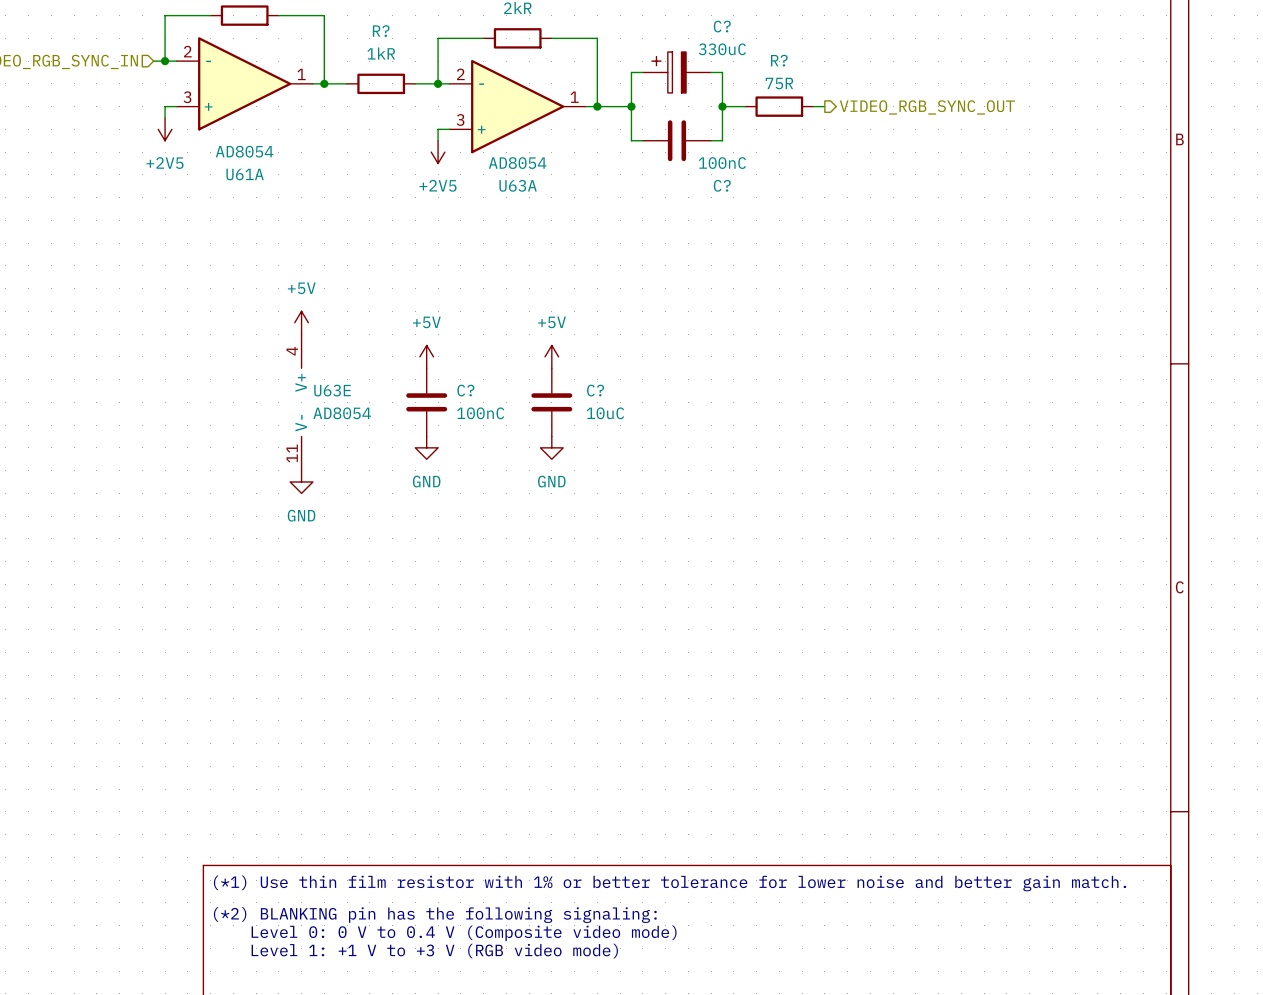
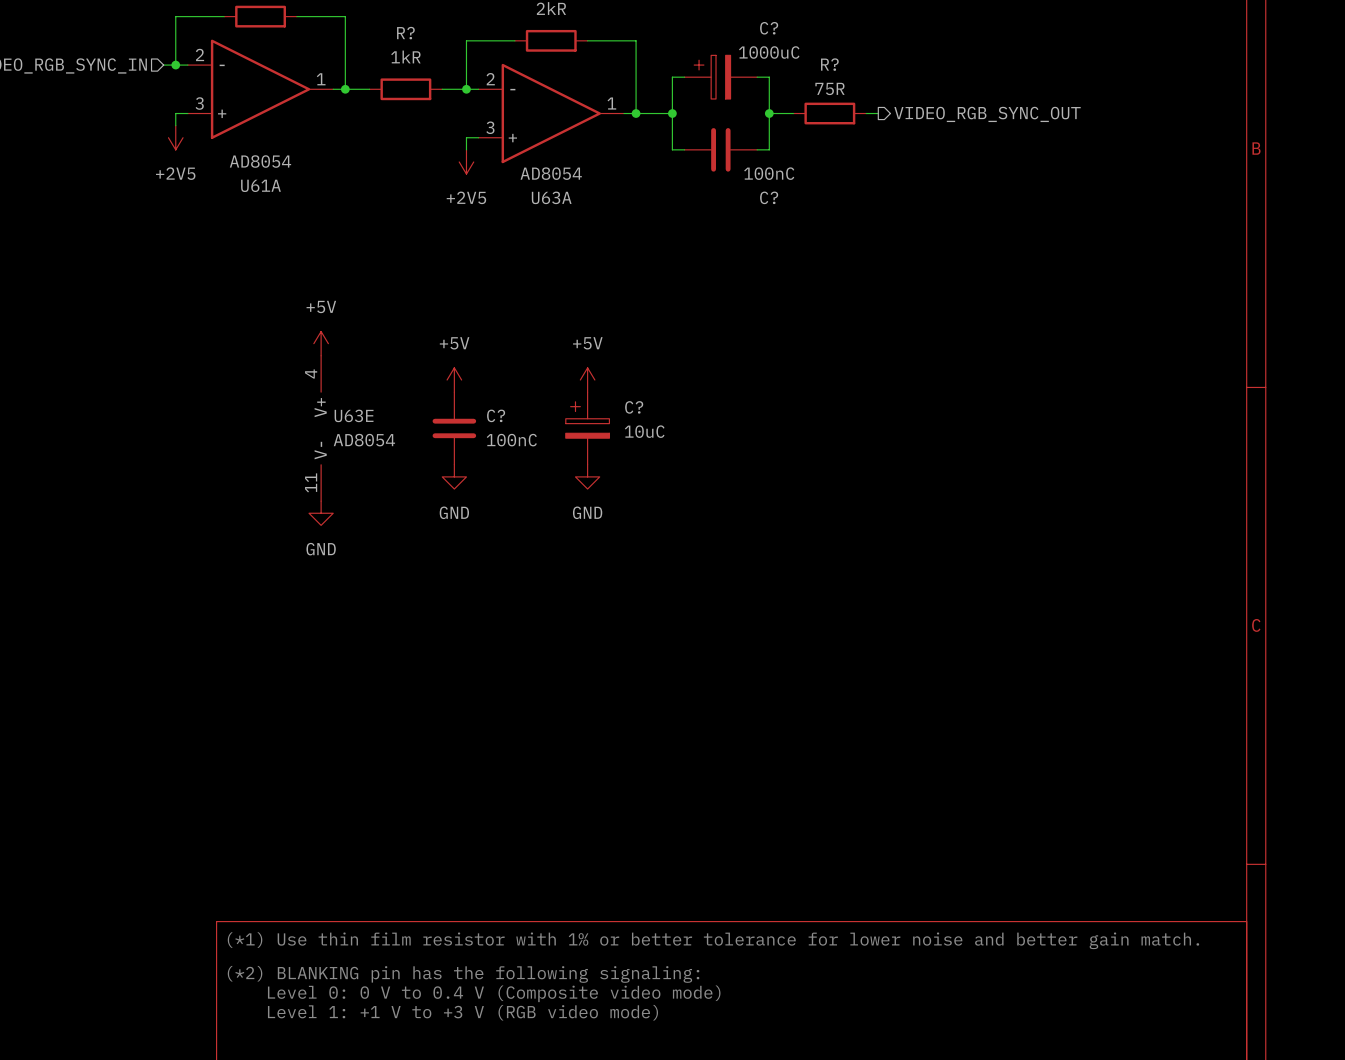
C? value: 330uC (722, 49) -> 1000uC (769, 52)
C? symbol: [531, 368, 573, 437] -> [565, 392, 610, 465]

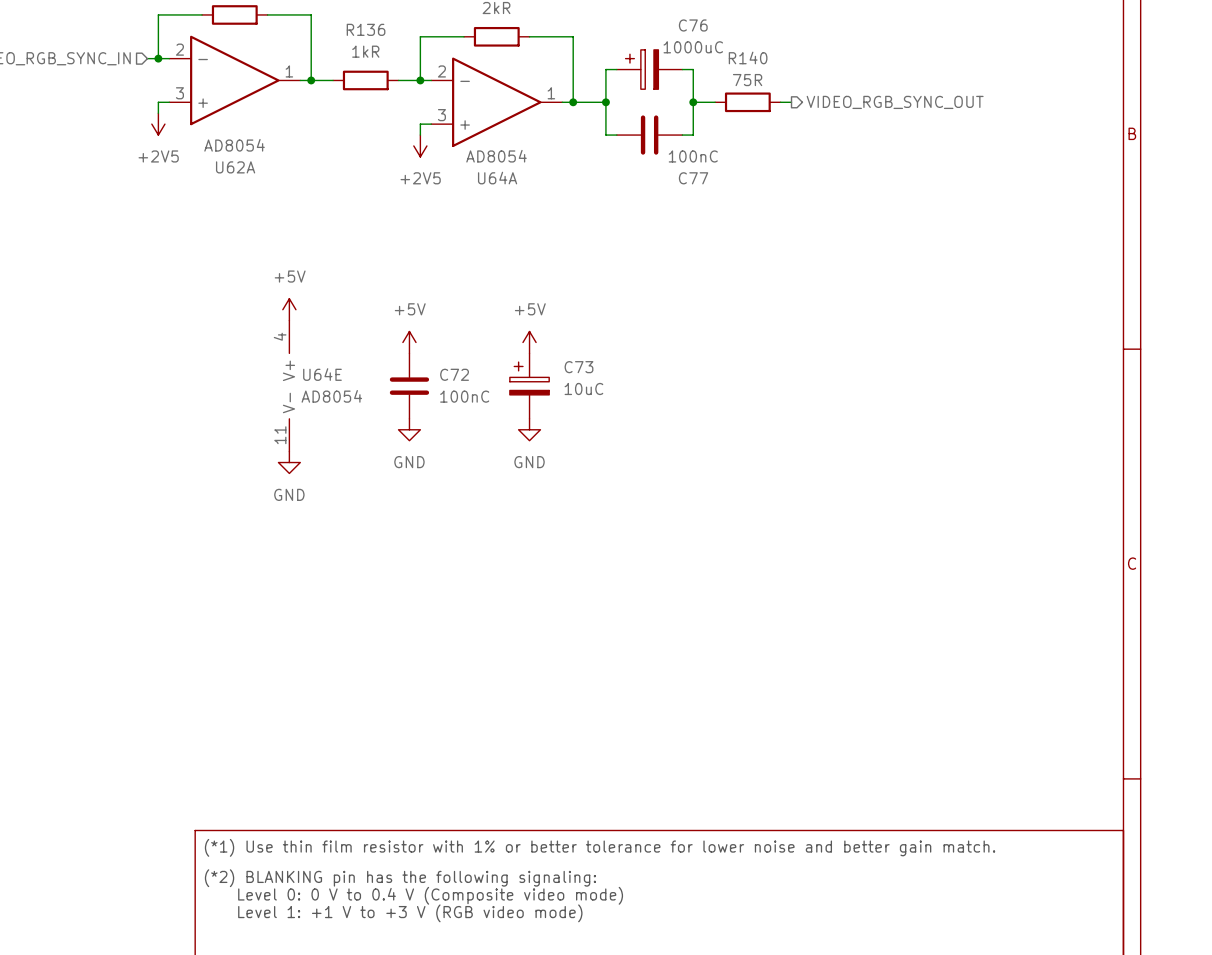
C? name: C? (769, 28) -> C76 (693, 25)
R? name: R? (405, 33) -> R136 (366, 29)
R? name: R? (829, 64) -> R140 (748, 57)
U61A name: U61A (260, 185) -> U62A (235, 167)
U63A name: U63A (551, 197) -> U64A (497, 178)
C? name: C? (769, 197) -> C77 (693, 178)
C? name: C? (634, 407) -> C73 (579, 367)
U63E name: U63E (354, 415) -> U64E (322, 374)
C? name: C? (496, 415) -> C72 (454, 374)

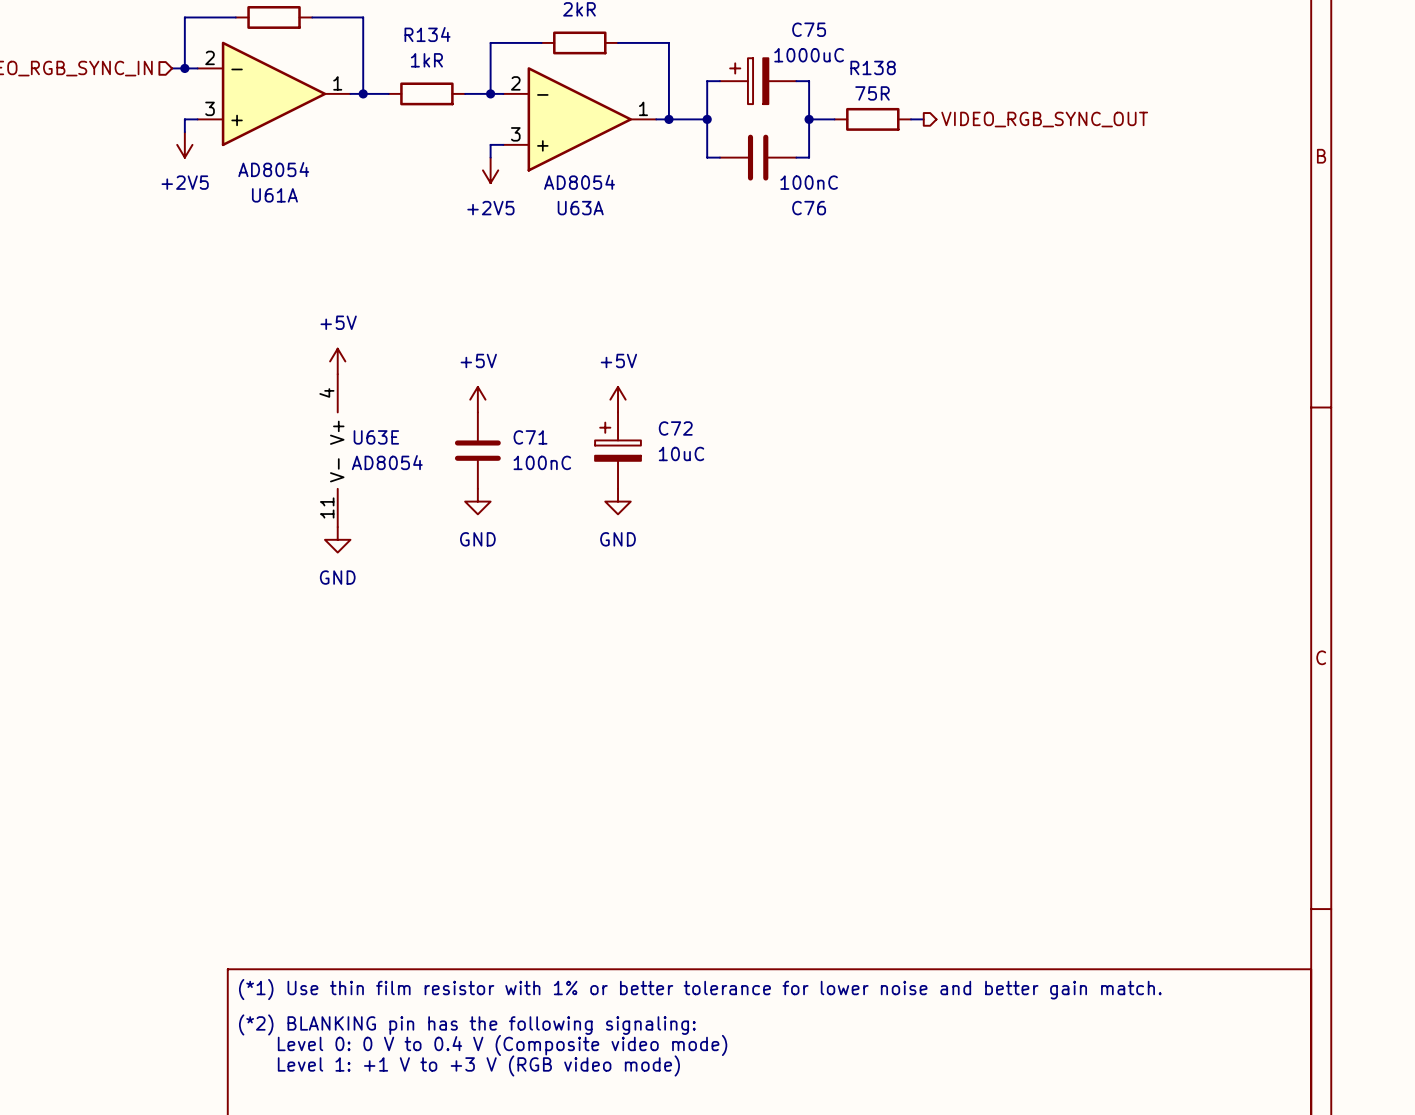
C76 name: C76 (693, 25) -> C75 (809, 29)
R136 name: R136 (366, 29) -> R134 (427, 34)
R140 name: R140 (748, 57) -> R138 (873, 67)
U62A name: U62A (235, 167) -> U61A (274, 195)
U64A name: U64A (497, 178) -> U63A (580, 208)
C77 name: C77 (693, 178) -> C76 (809, 208)
C73 name: C73 (579, 367) -> C72 (675, 428)
U64E name: U64E (322, 374) -> U63E (376, 437)
C72 name: C72 (454, 374) -> C71 (530, 437)

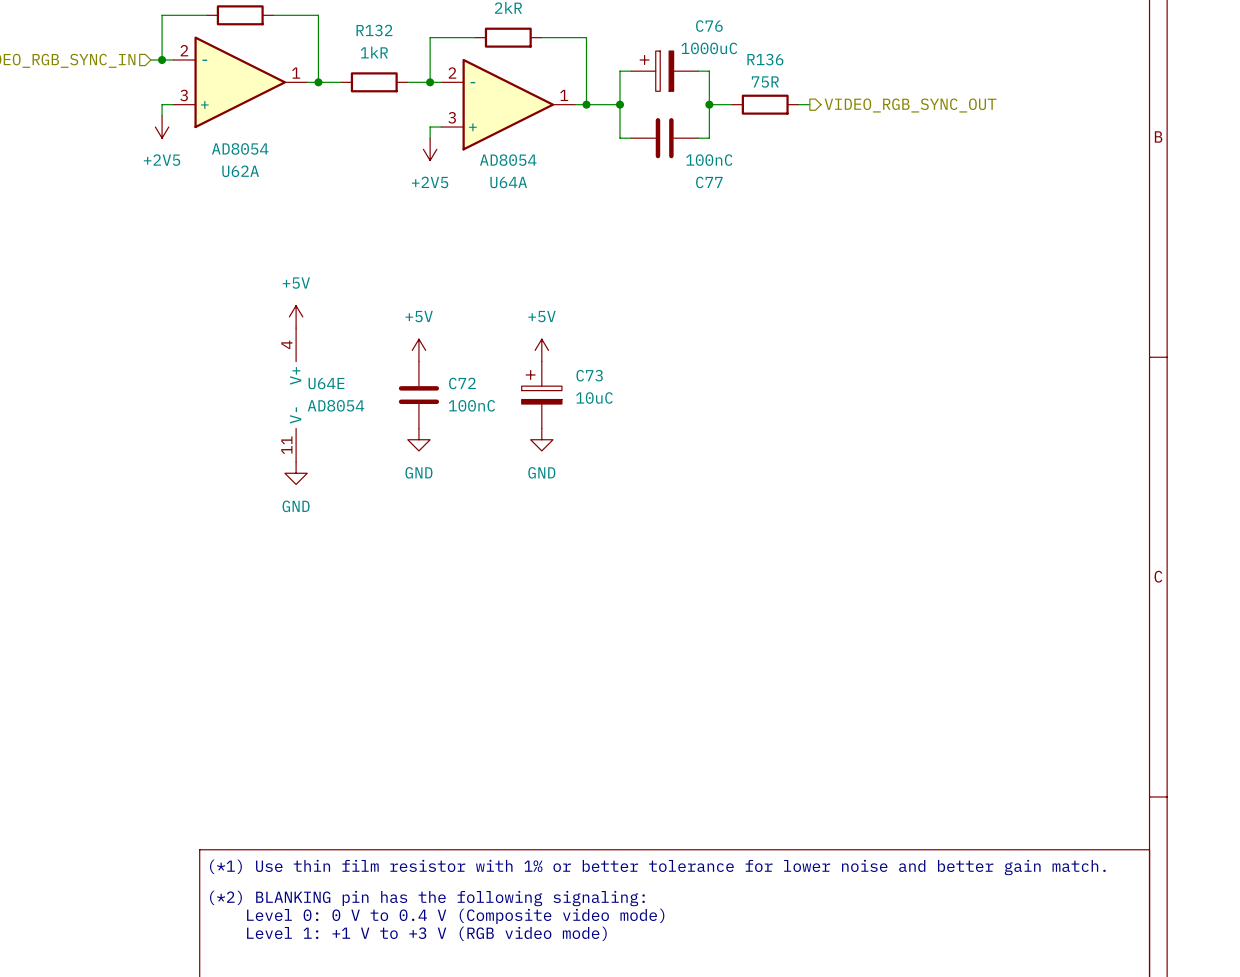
C75 name: C75 (809, 29) -> C76 (709, 26)
R134 name: R134 (427, 34) -> R132 (374, 30)
R138 name: R138 (873, 67) -> R136 (765, 59)
U61A name: U61A (274, 195) -> U62A (240, 171)
U63A name: U63A (580, 208) -> U64A (508, 182)
C76 name: C76 (809, 208) -> C77 (709, 182)
C72 name: C72 (675, 428) -> C73 (589, 375)
U63E name: U63E (376, 437) -> U64E (326, 383)
C71 name: C71 (530, 437) -> C72 (462, 383)

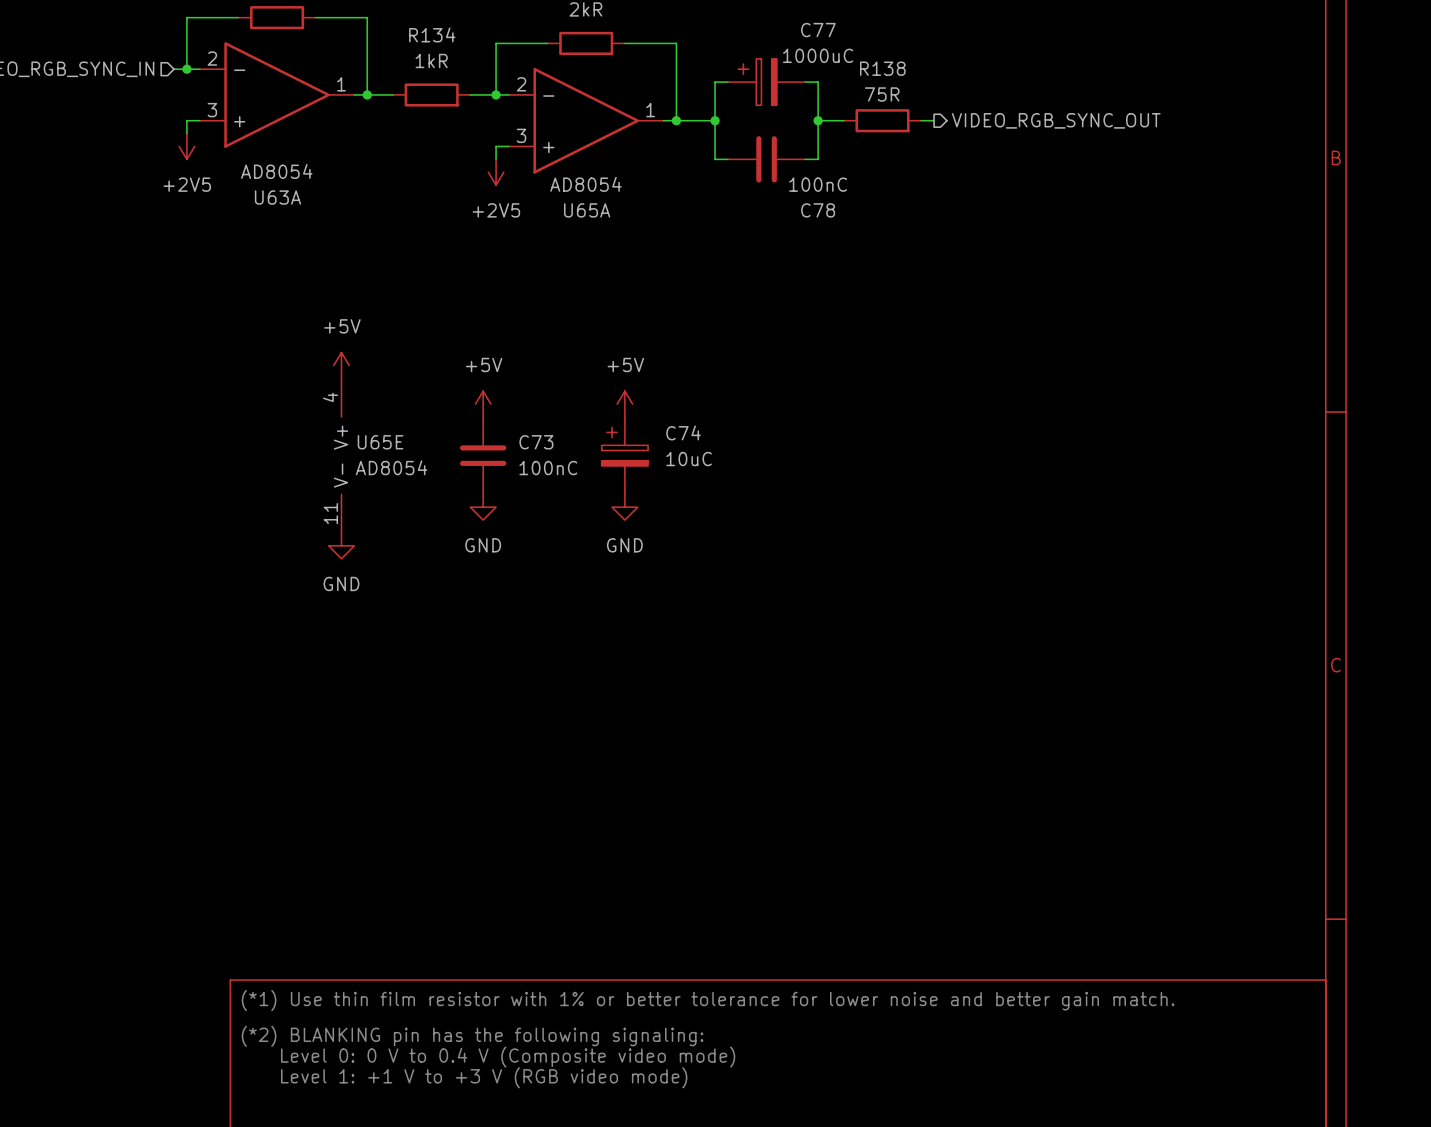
C76 name: C76 (709, 26) -> C77 (818, 30)
R132 name: R132 (374, 30) -> R134 (432, 34)
R136 name: R136 (765, 59) -> R138 (882, 68)
U62A name: U62A (240, 171) -> U63A (278, 197)
U64A name: U64A (508, 182) -> U65A (587, 210)
C77 name: C77 (709, 182) -> C78 (818, 210)
C73 name: C73 (589, 375) -> C74 (683, 432)
U64E name: U64E (326, 383) -> U65E (380, 442)
C72 name: C72 (462, 383) -> C73 (536, 442)

